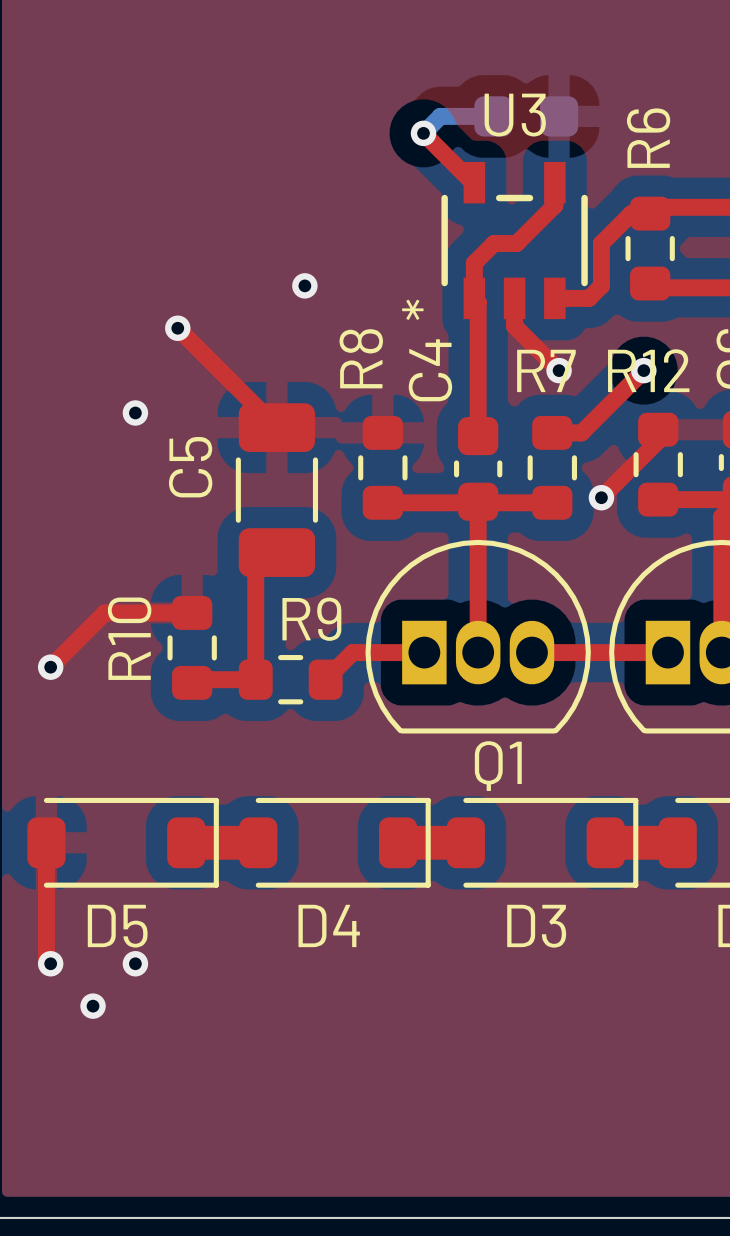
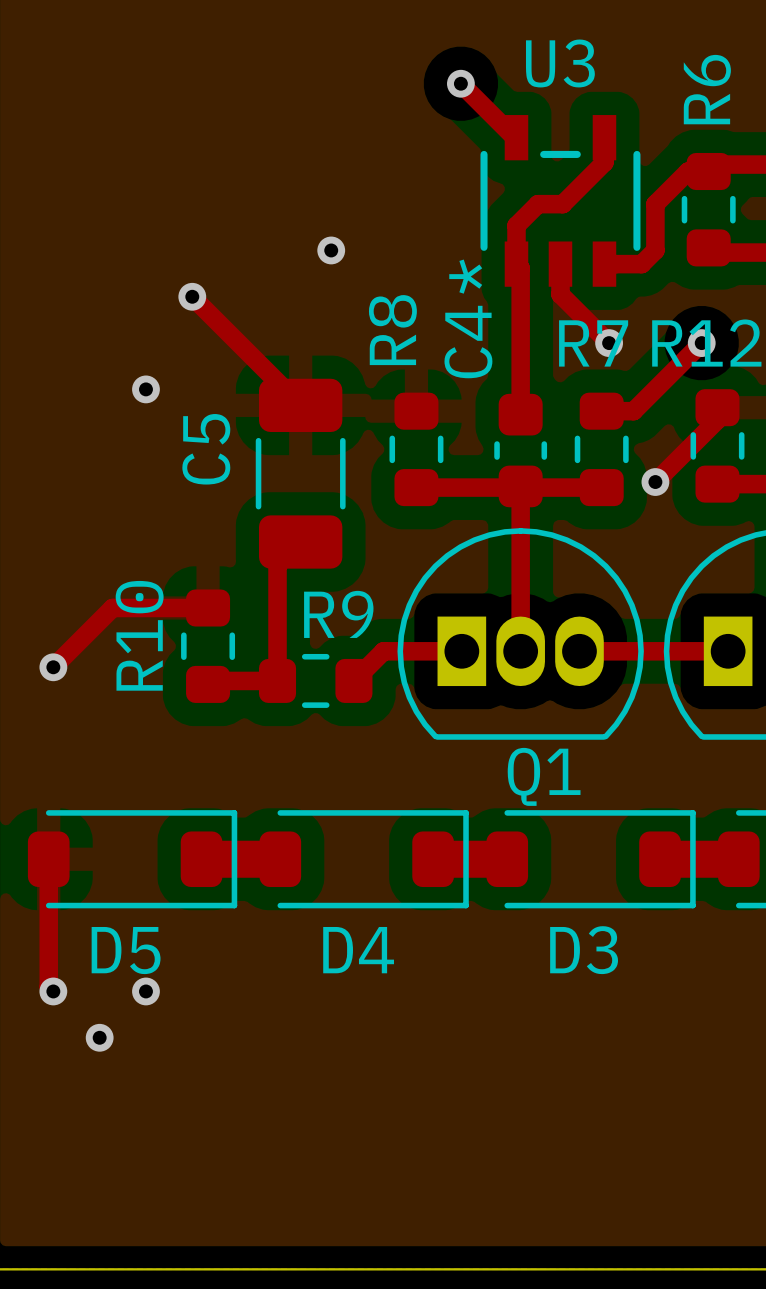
bottom track: (493, 116) (440, 116) (423, 133) -> none
part: (526, 116) -> none

